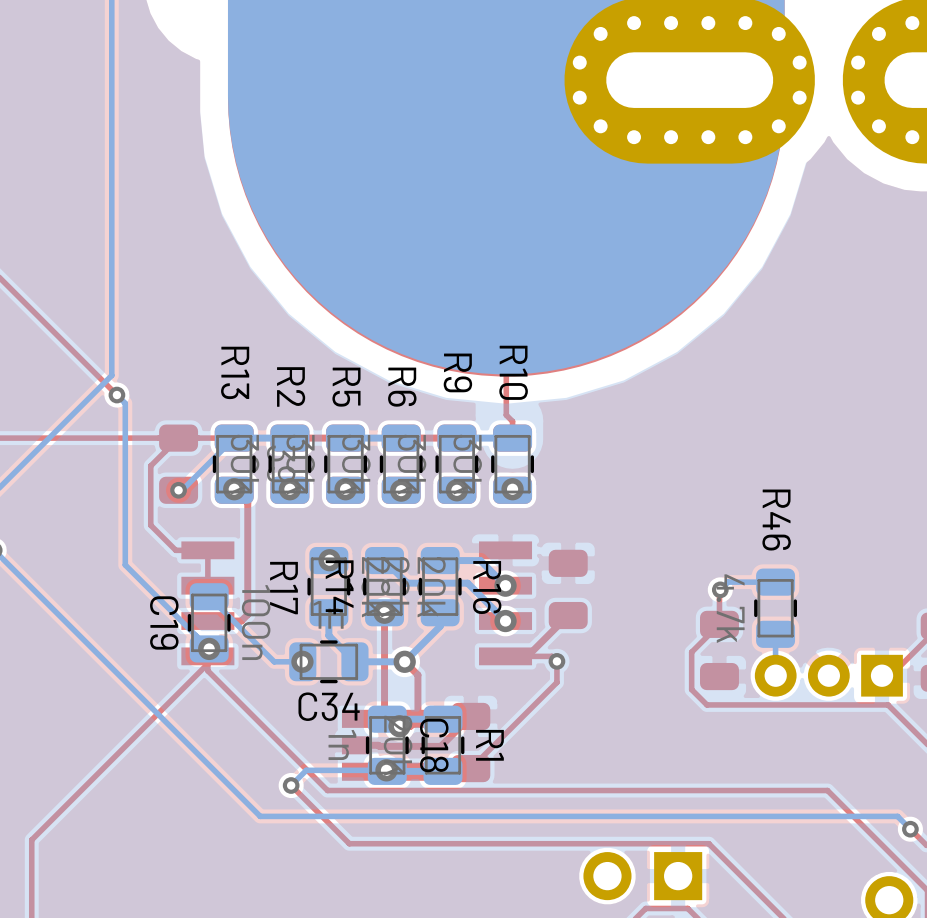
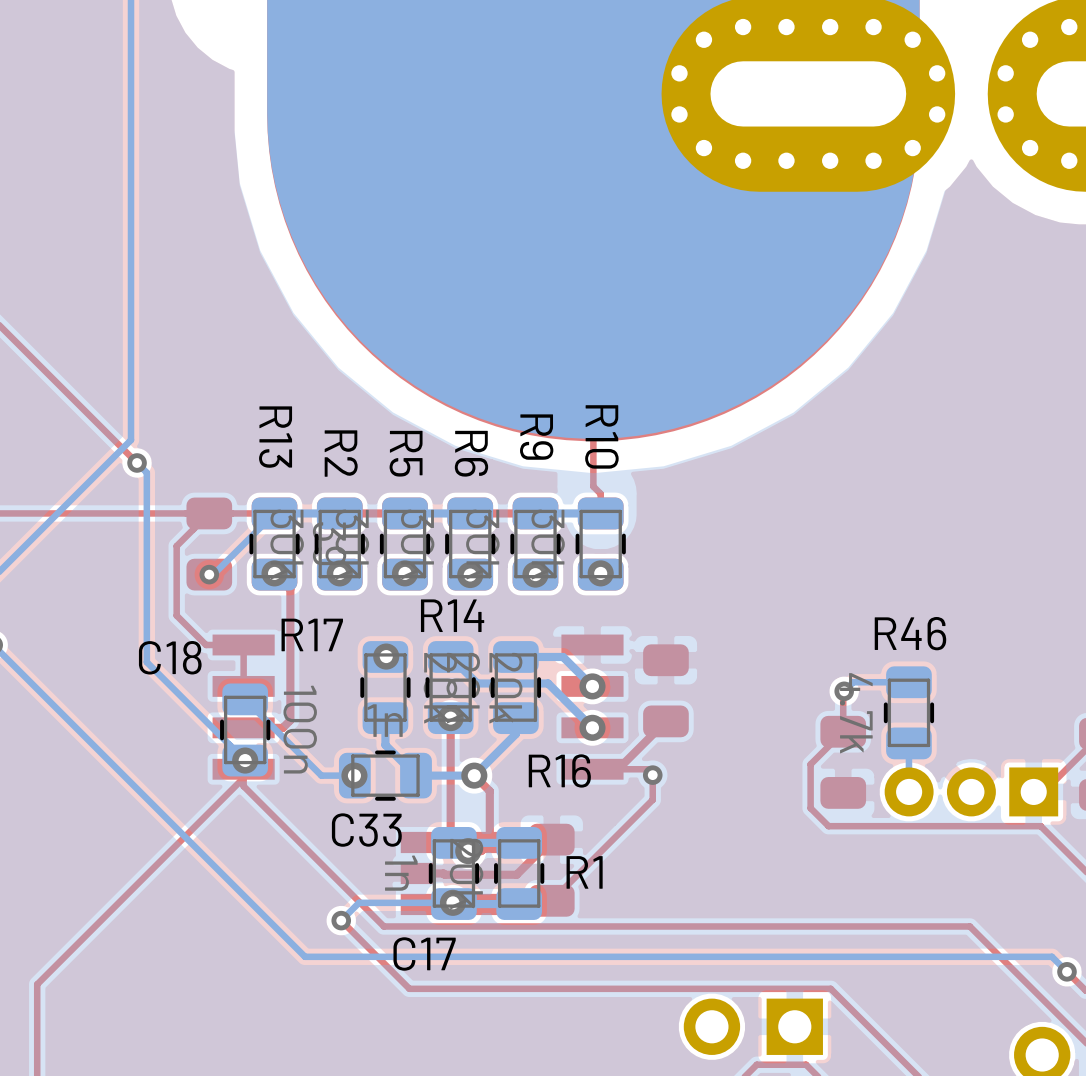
R46 name rotation: 0° (776, 520) -> 90° counterclockwise (910, 633)
R14 name rotation: 0° (339, 587) -> 90° counterclockwise (452, 615)
R16 name rotation: 0° (487, 587) -> 90° counterclockwise (559, 770)
R17 name rotation: 0° (283, 588) -> 90° counterclockwise (312, 634)
C19 name: C19 (164, 622) -> C18 (170, 657)
C34 name: C34 (329, 706) -> C33 (366, 830)
C18 name: C18 (434, 745) -> C17 (424, 953)
R1 name rotation: 0° (489, 745) -> 90° counterclockwise (584, 872)

